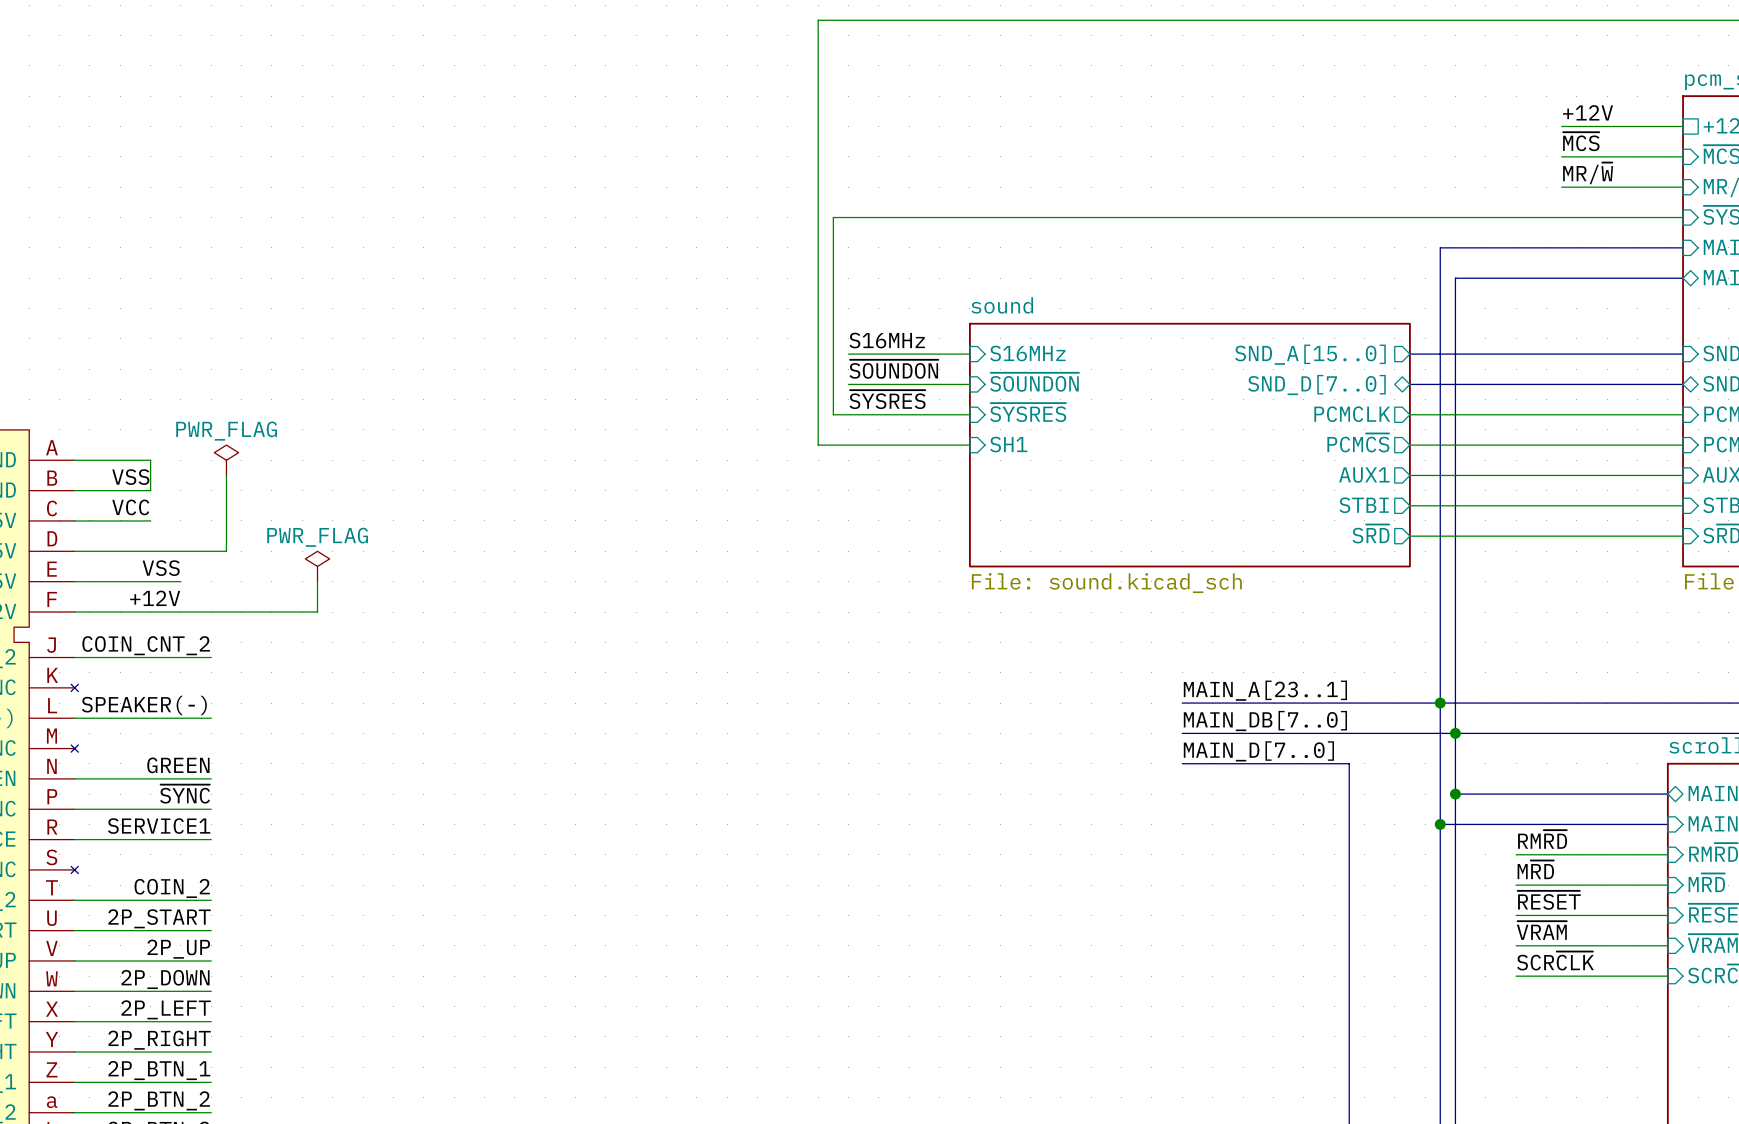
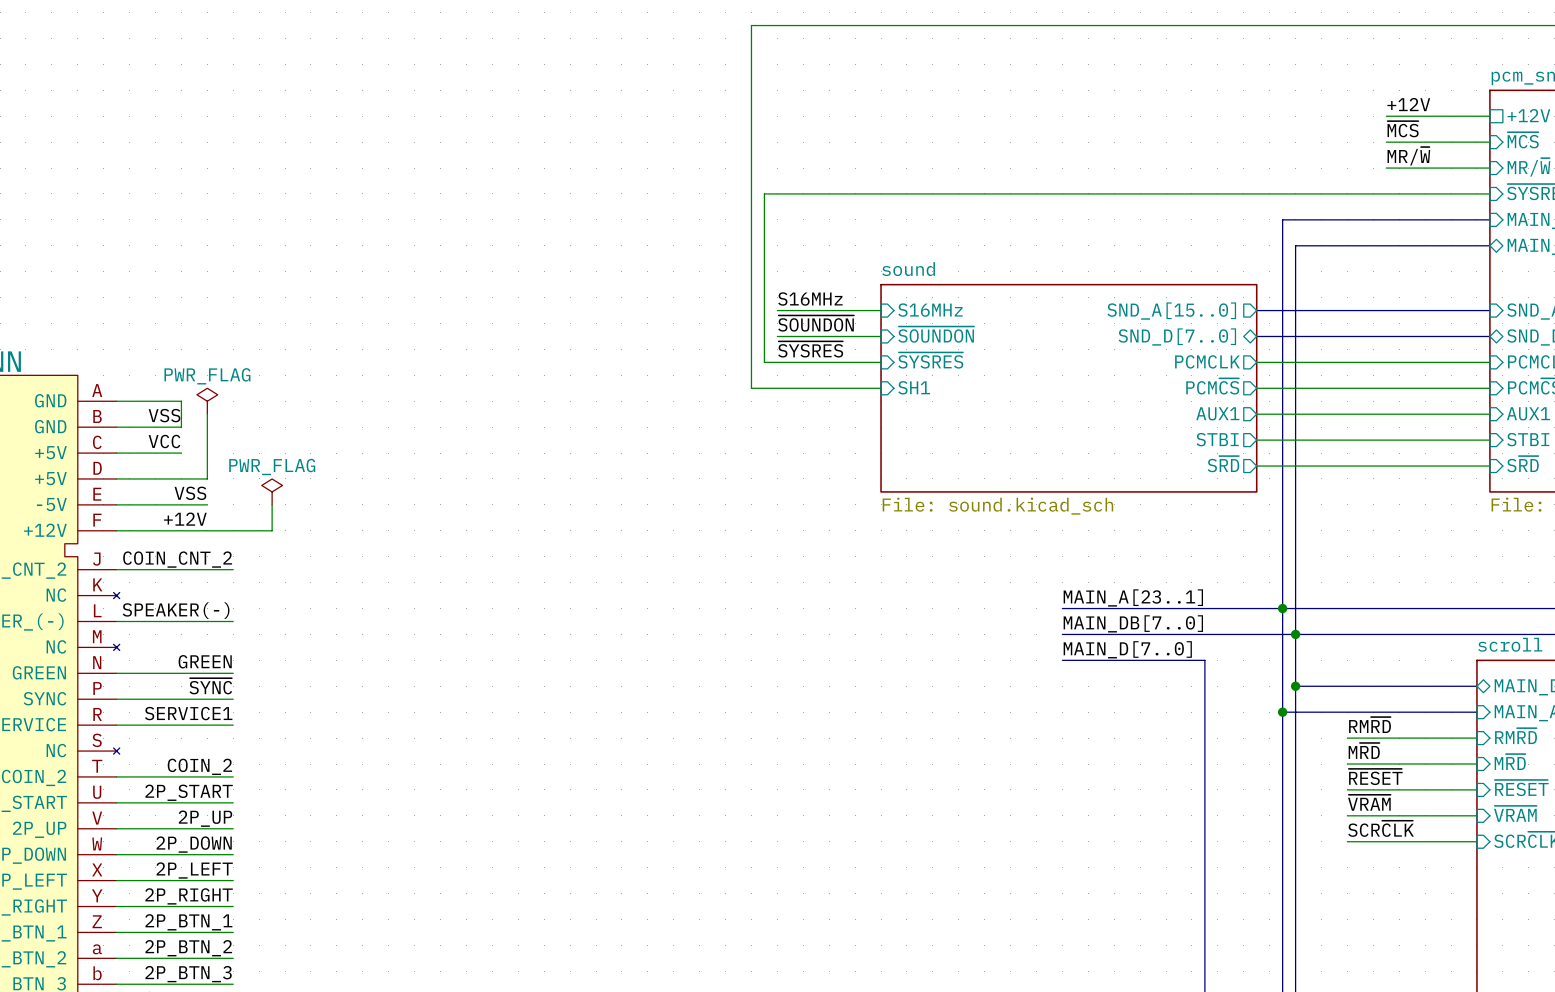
power symbol position: PWR_FLAG (226, 460) -> PWR_FLAG (207, 401)
wire: (226, 475) (226, 551) (180, 551) -> (207, 414) (207, 478)
power symbol: none -> PWR_FLAG (272, 491)
power symbol: PWR_FLAG (317, 566) -> none
wire: (317, 581) (317, 612) (256, 612) -> (272, 504) (272, 530)

